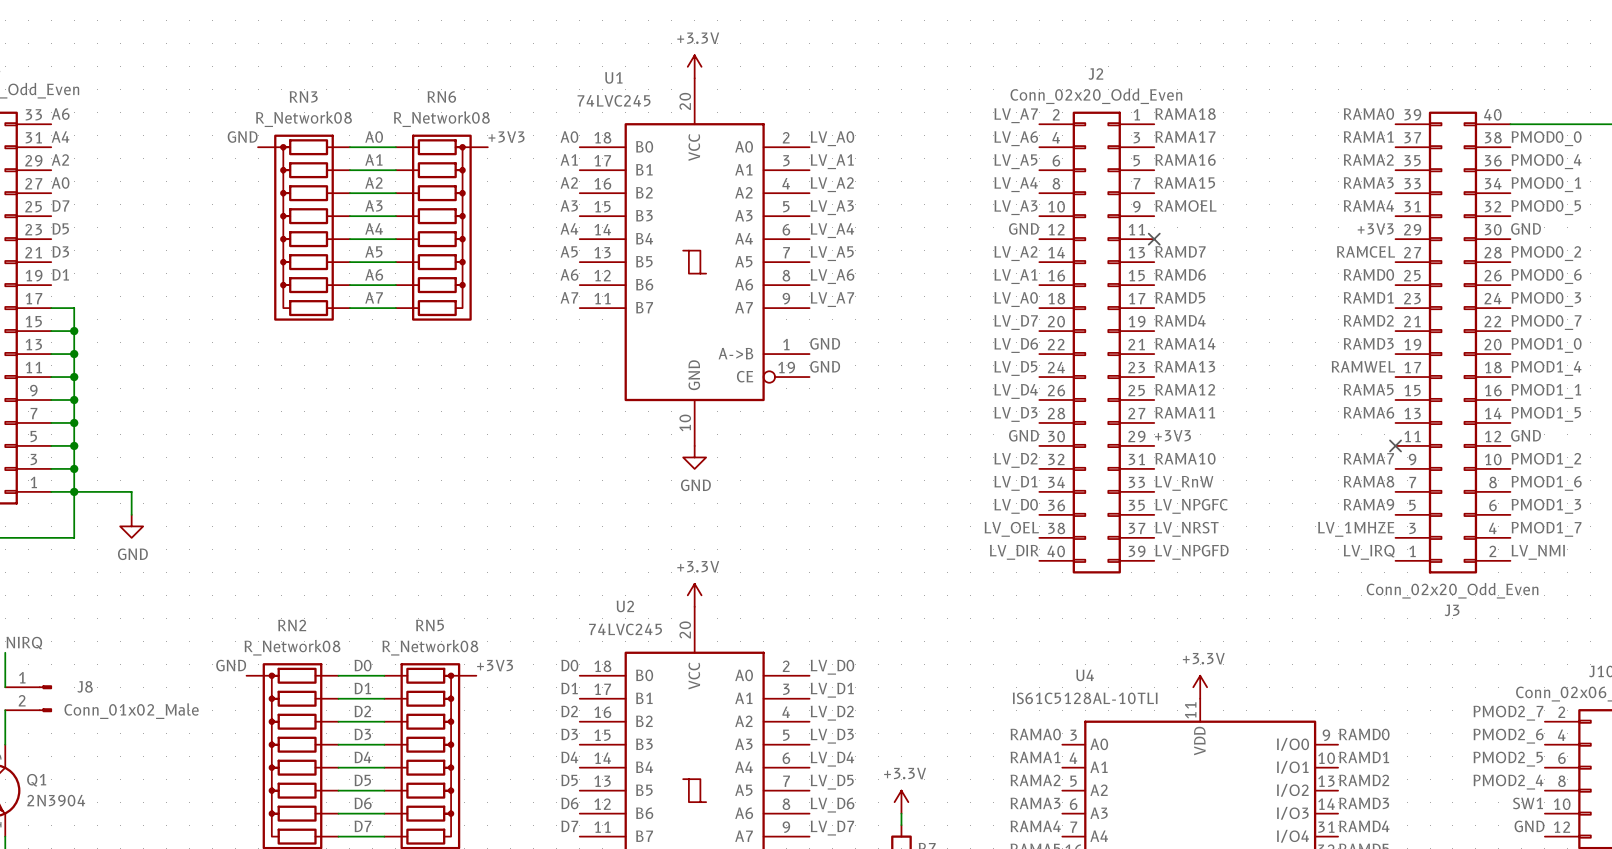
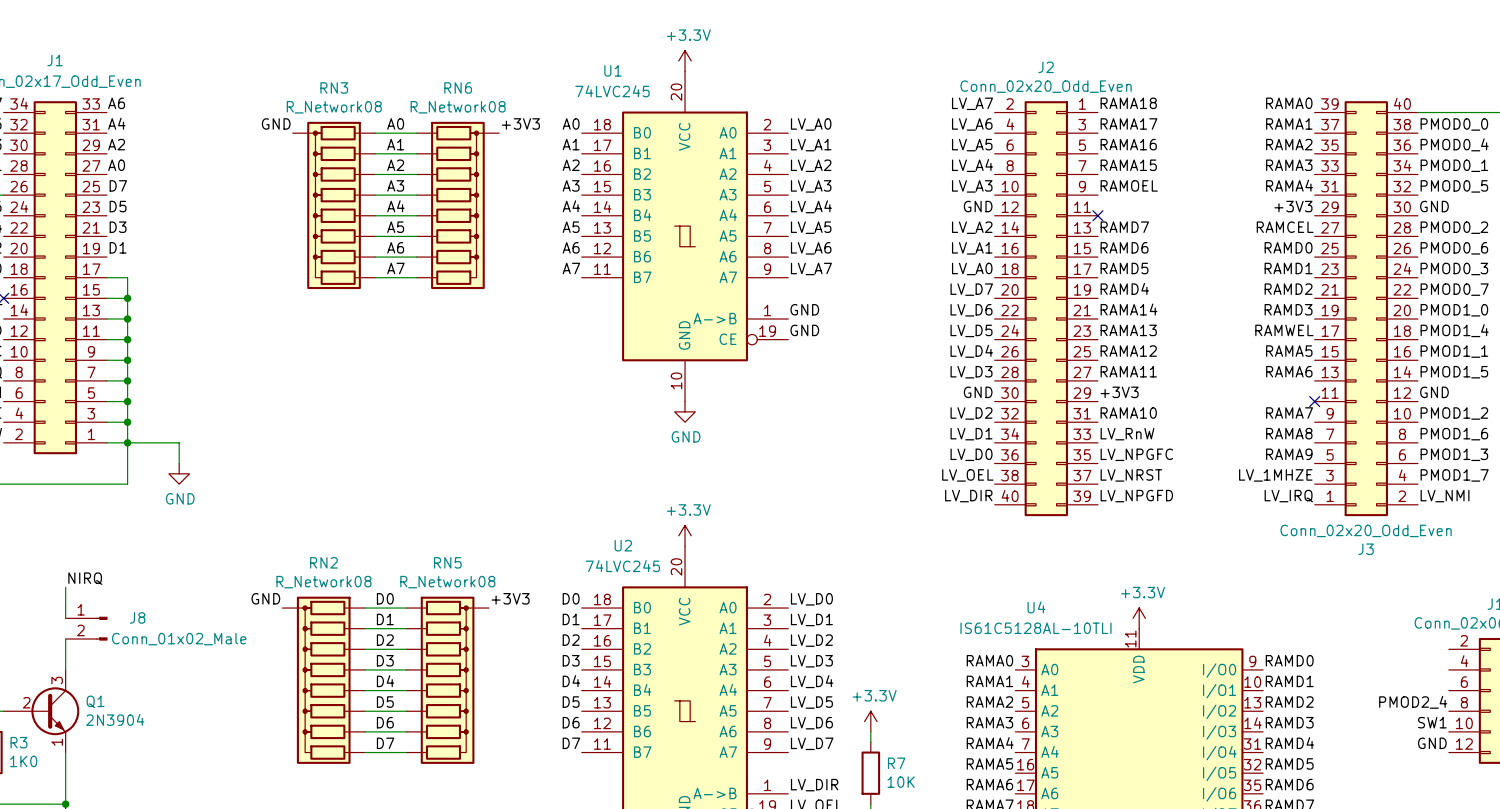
label: PMOD2_7 (1508, 713) -> none
label: PMOD2_6 (1508, 736) -> none
label: PMOD2_5 (1508, 759) -> none

